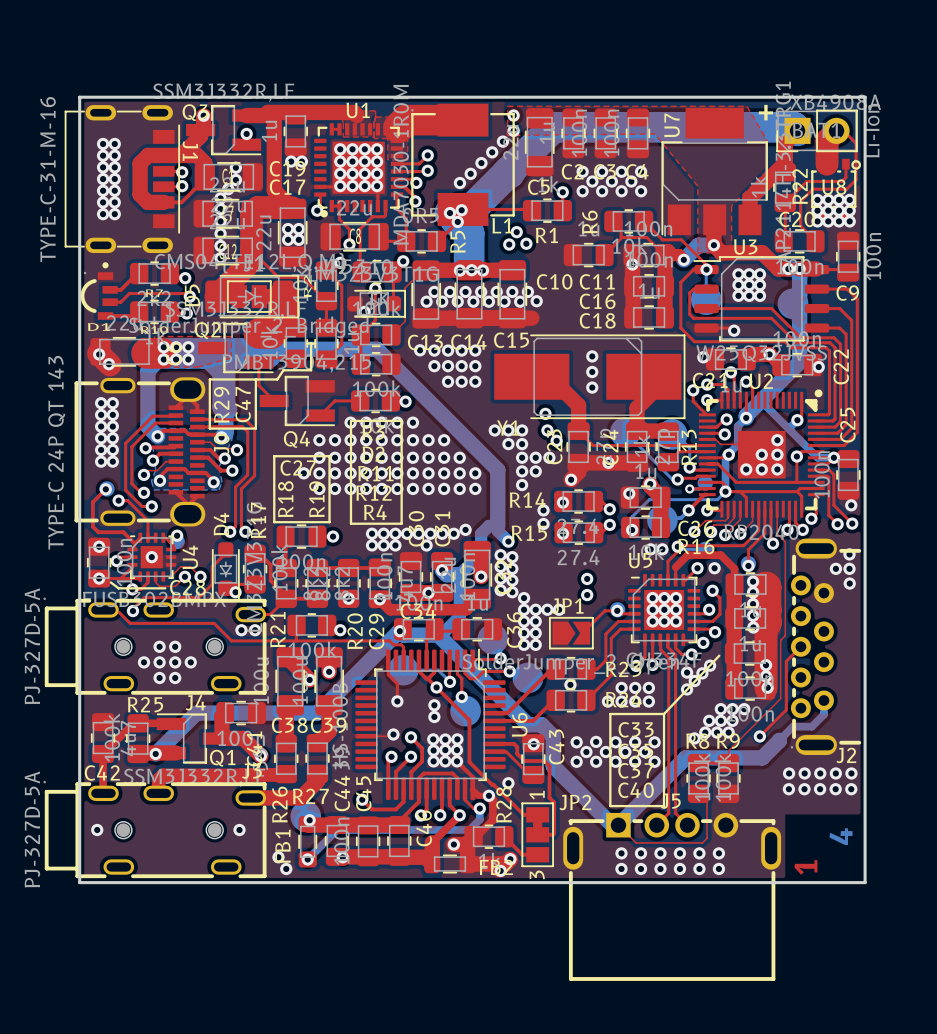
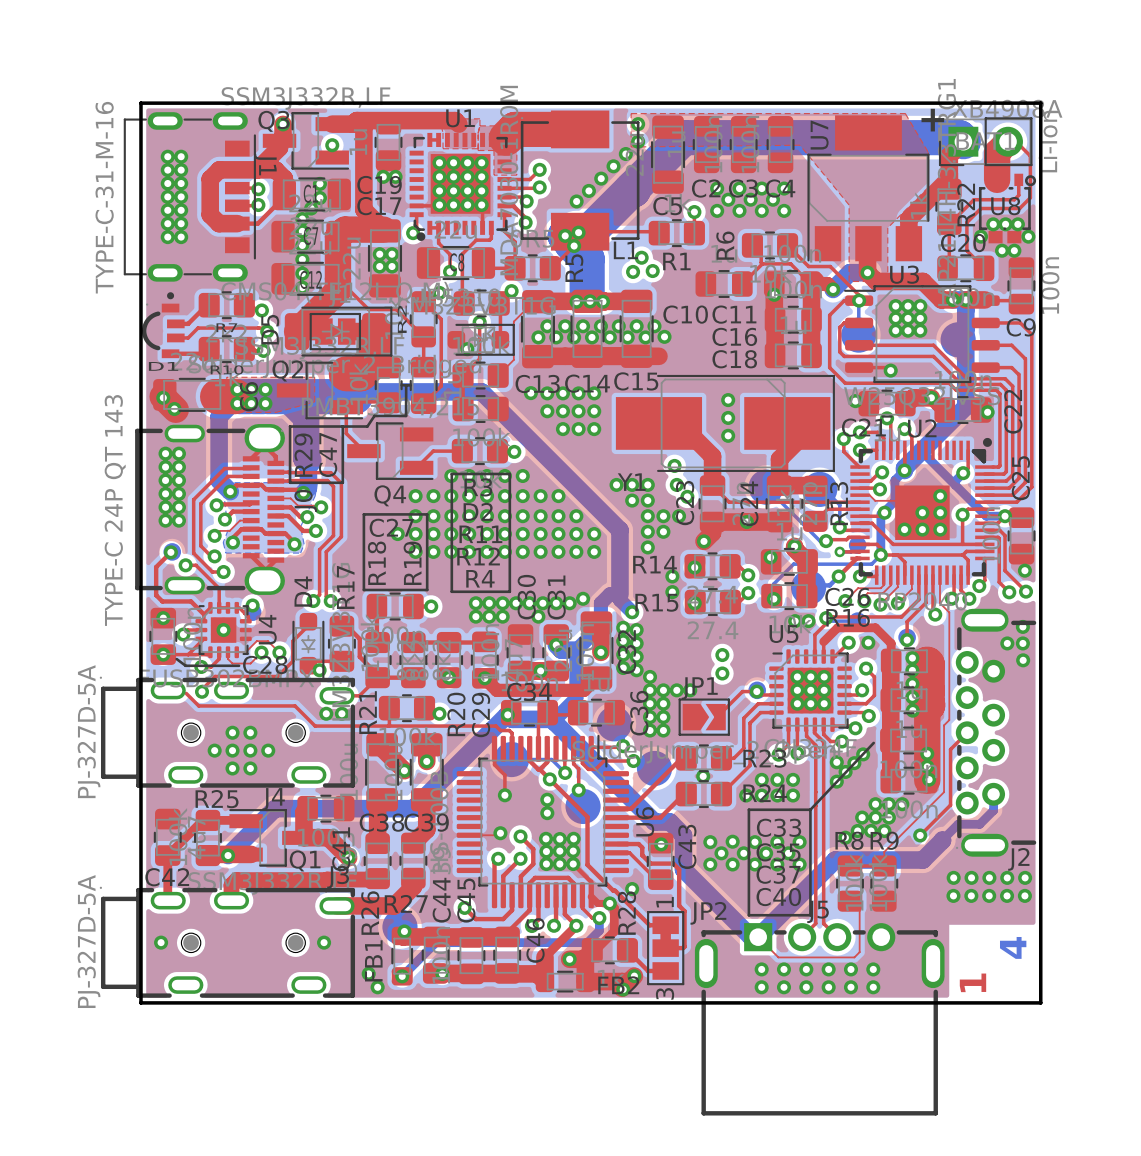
via: (817, 199) -> none
via: (828, 199) -> none
via: (838, 199) -> none
via: (849, 199) -> none
via: none -> (993, 224)
via: none -> (1005, 224)
via: none -> (1017, 224)
via: (817, 210) -> none
via: (828, 210) -> none
via: (838, 210) -> none
via: (849, 210) -> none
via: none -> (980, 236)
via: none -> (1028, 236)
via: (817, 221) -> none
via: (828, 221) -> none
via: (838, 221) -> none
via: (849, 221) -> none
via: none -> (1002, 250)
via: none -> (1014, 250)

